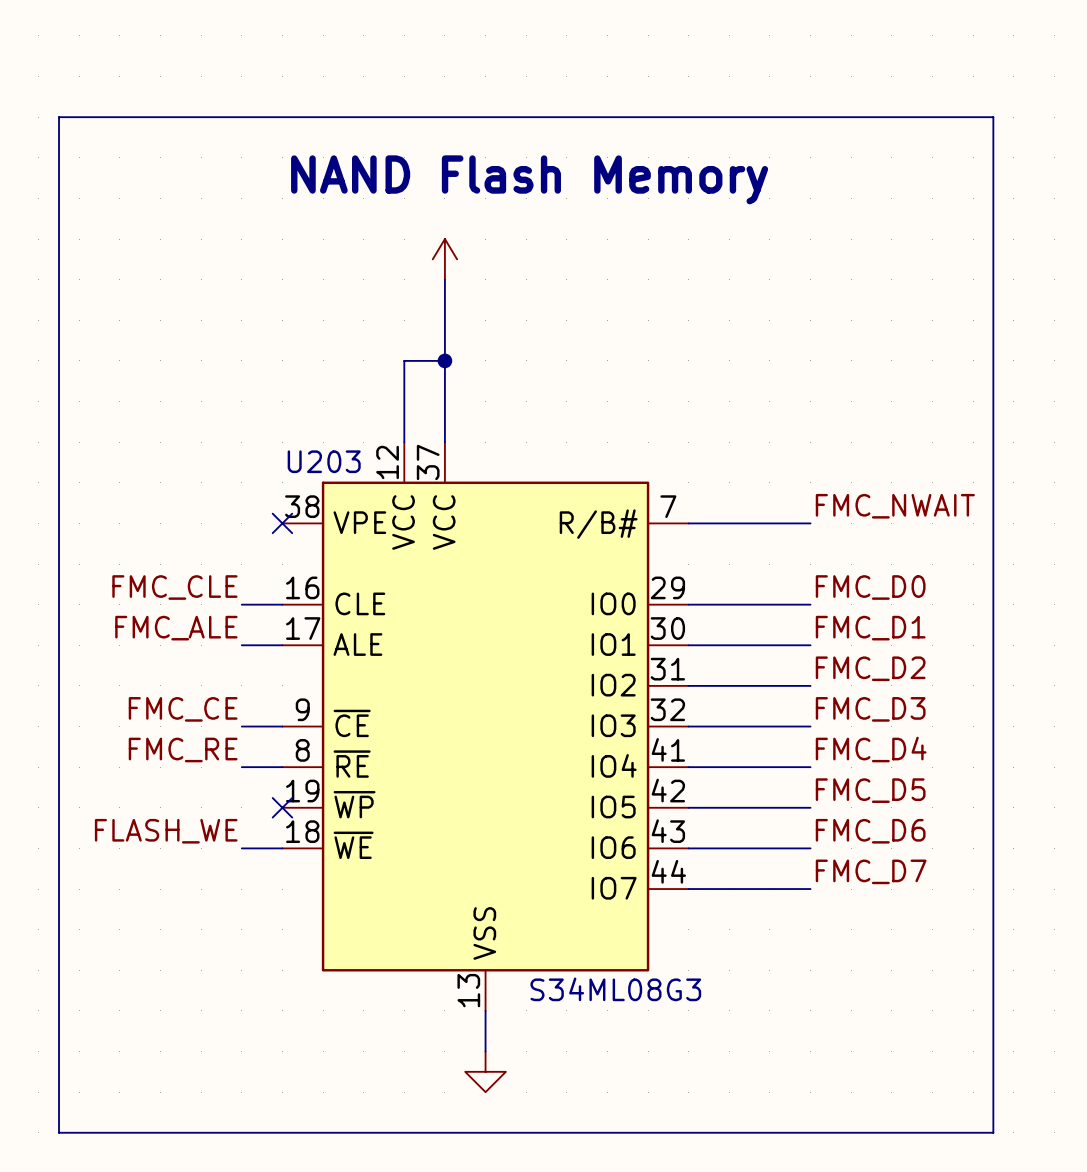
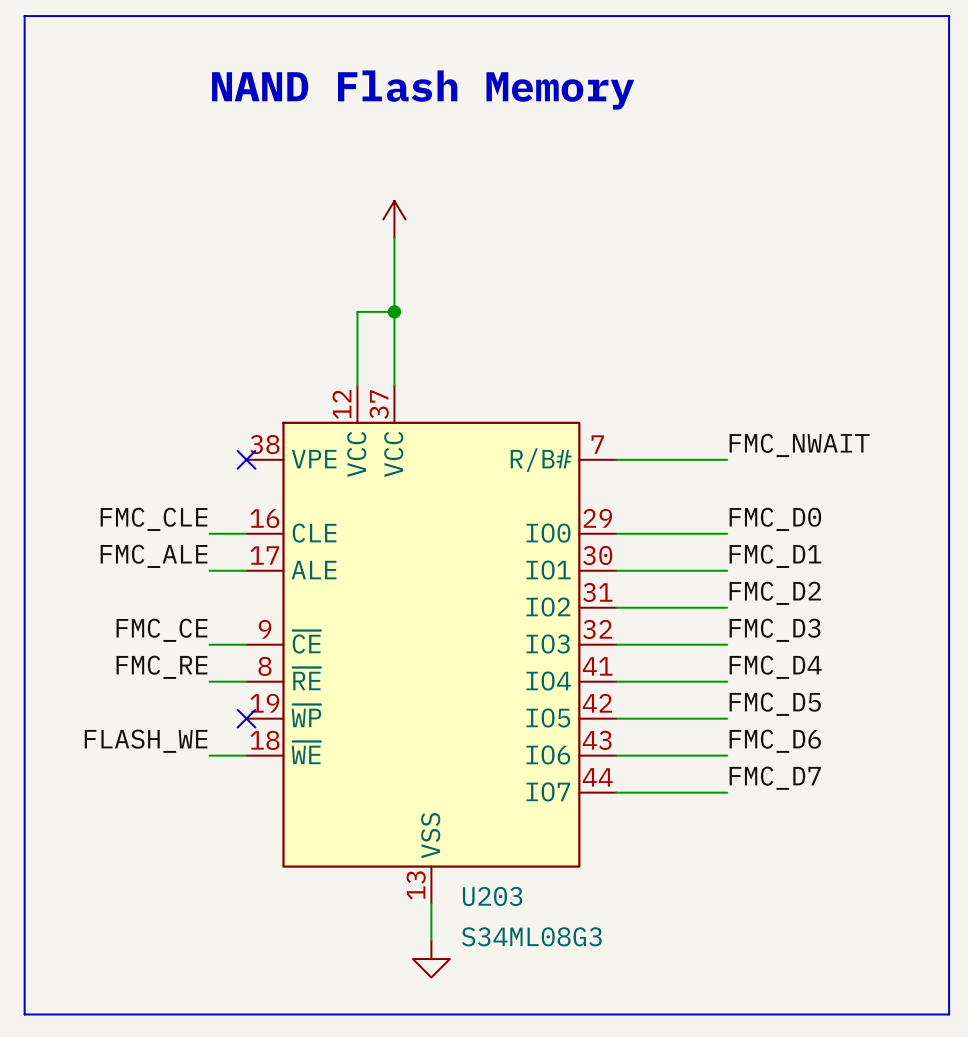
text position: NAND Flash Memory (529, 179) -> NAND Flash Memory (423, 90)
U203 name position: U203 (324, 461) -> U203 (492, 896)
U203 value position: S34ML08G3 (615, 989) -> S34ML08G3 (531, 936)
line: (59, 1132) (59, 117) (993, 117) (993, 1132) -> (43, 1014) (24, 1014) (24, 16) (949, 16) (949, 1014) (893, 1014)

